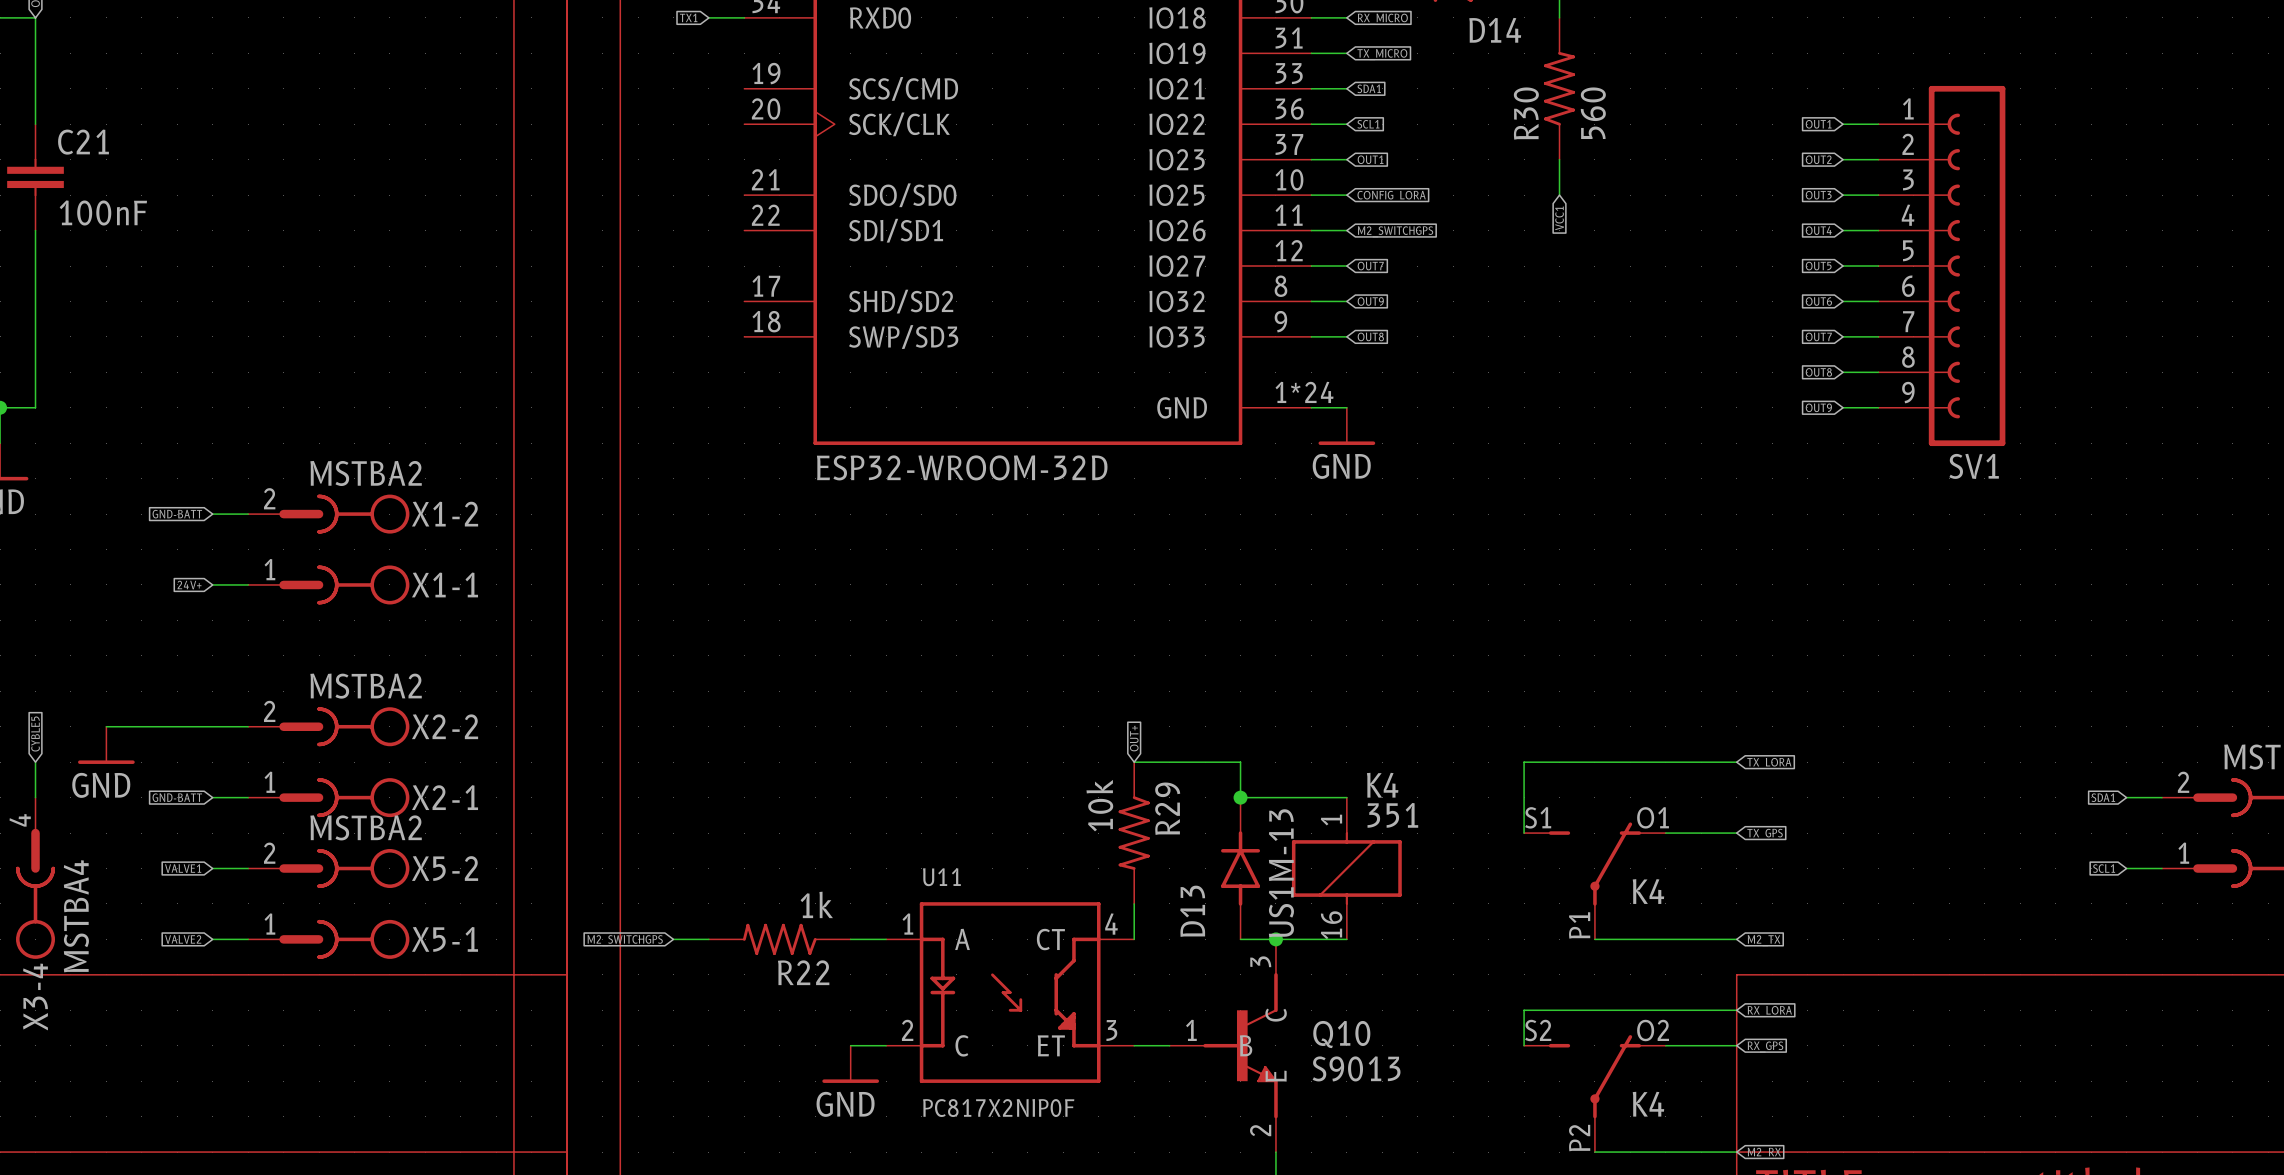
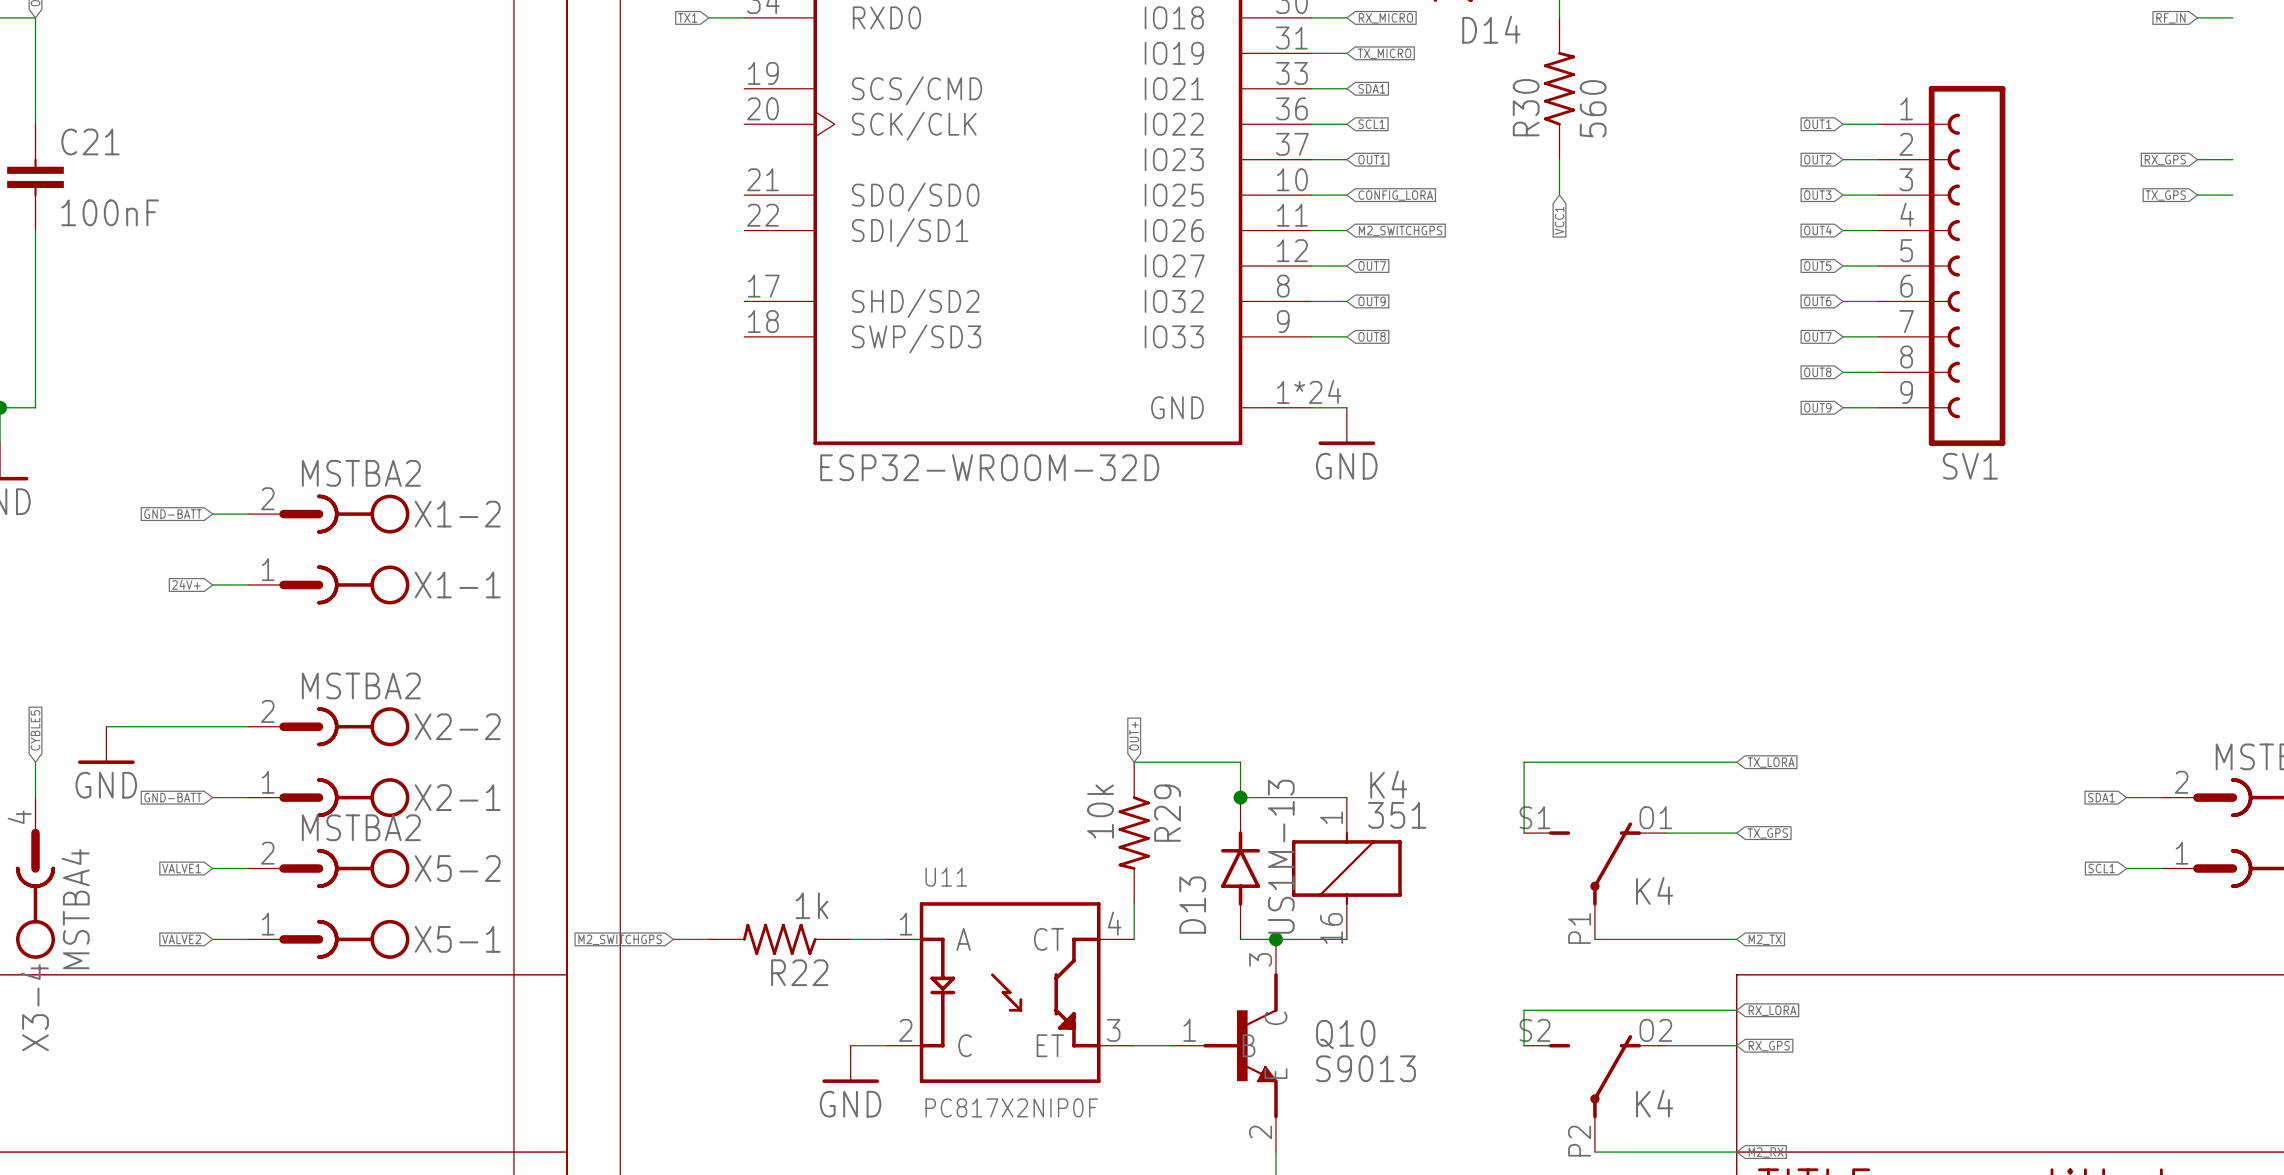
wire: none -> (2197, 17) (2232, 17)
global label: none -> RF_IN (2170, 18)
wire: none -> (2197, 159) (2232, 159)
global label: none -> RX_GPS (2165, 160)
wire: none -> (2197, 195) (2232, 195)
global label: none -> TX_GPS (2165, 195)

